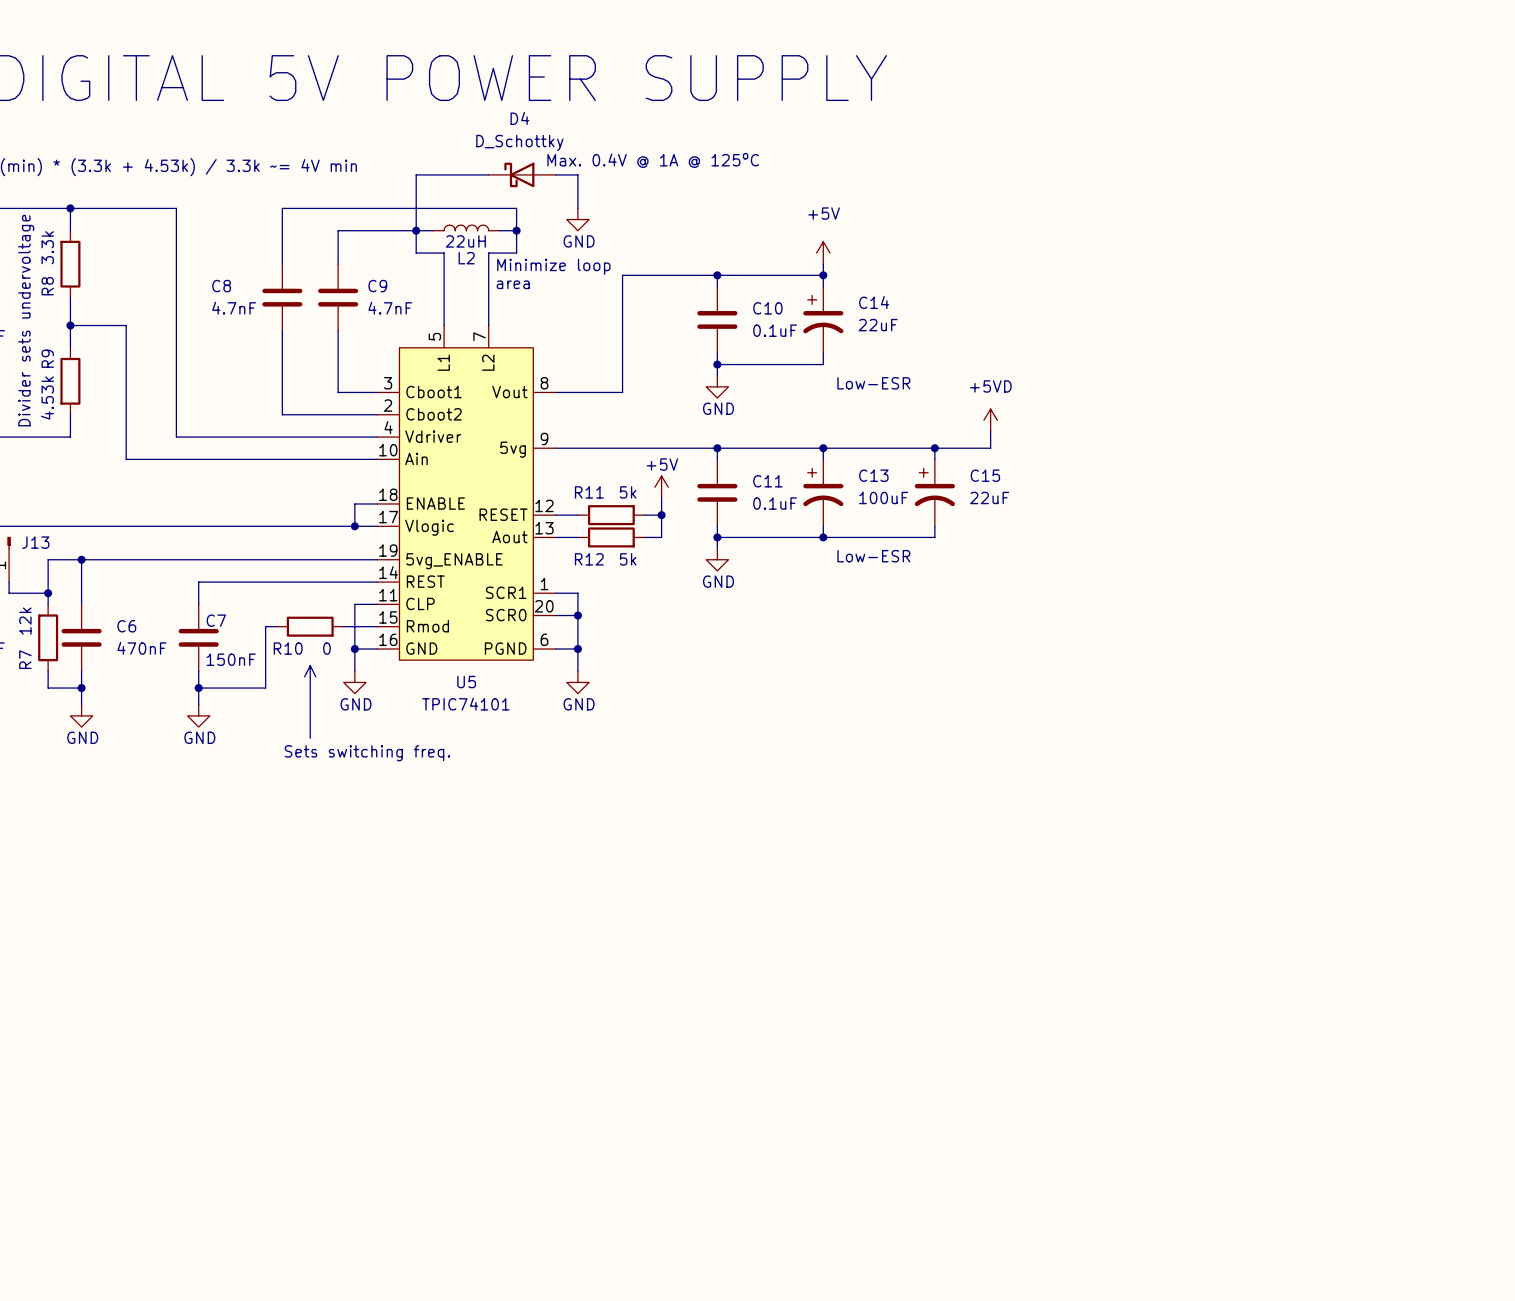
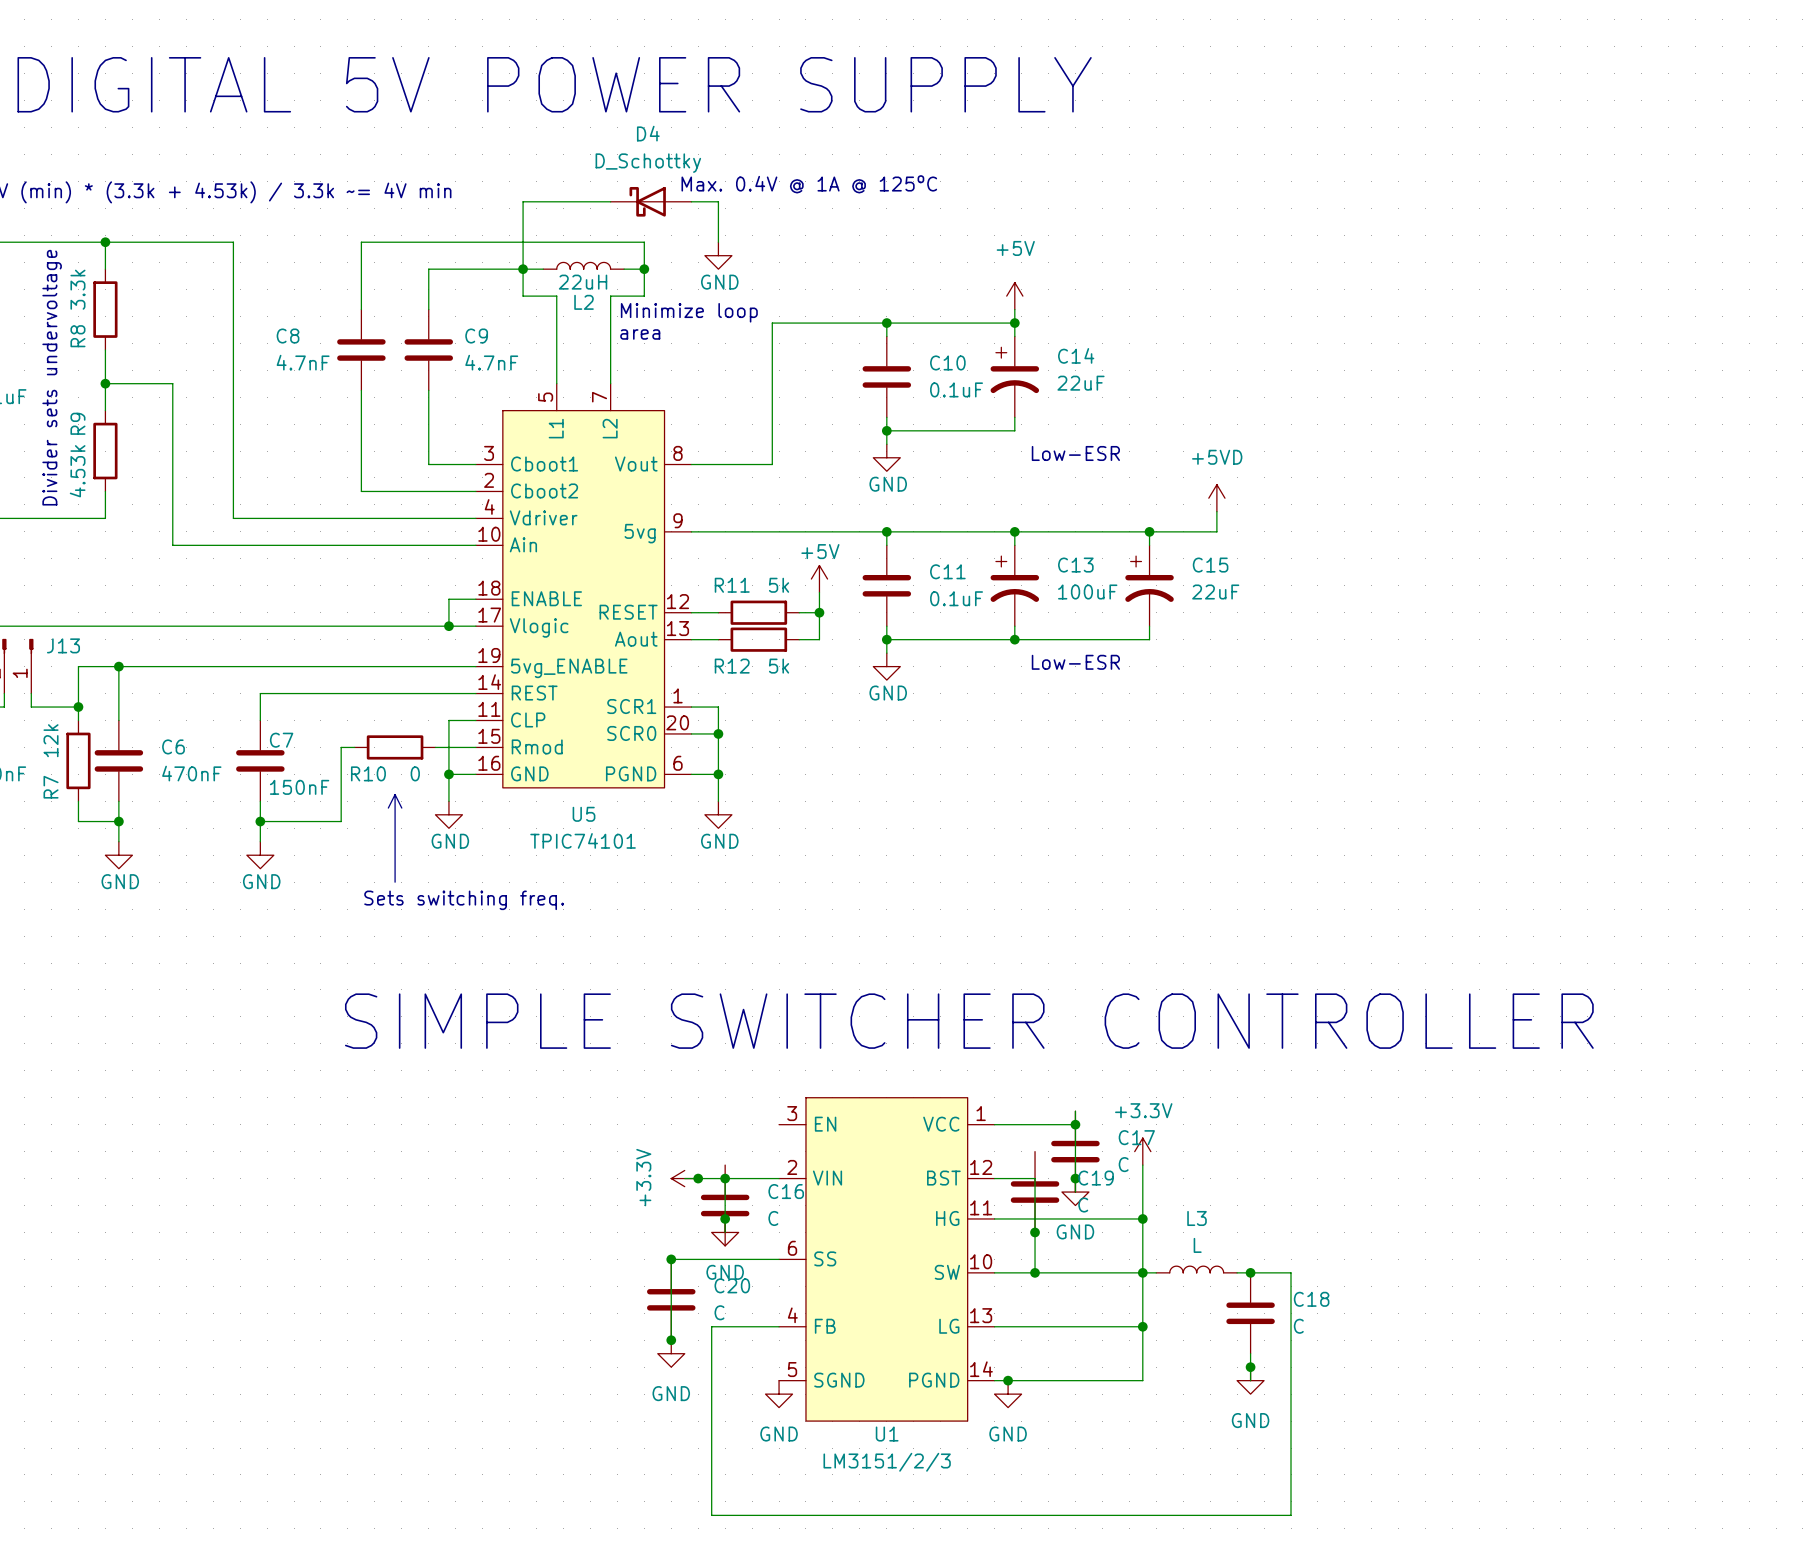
text: none -> SIMPLE SWITCHER CONTROLLER (969, 1021)
wire: none -> (1075, 1111) (1075, 1192)
wire: none -> (994, 1124) (1075, 1124)
junction: none -> (1075, 1124)
C17: none -> C (1075, 1151)
power symbol: none -> +3.3V (1142, 1151)
wire: none -> (1142, 1165) (1142, 1380) (994, 1380)
wire: none -> (684, 1178) (779, 1178)
power symbol: none -> +3.3V (684, 1178)
junction: none -> (698, 1178)
wire: none -> (725, 1178) (725, 1232)
junction: none -> (725, 1178)
wire: none -> (994, 1178) (1035, 1178) (1035, 1272)
junction: none -> (1075, 1178)
C19: none -> C (1035, 1192)
power symbol: none -> GND (1075, 1192)
C16: none -> C (725, 1205)
junction: none -> (725, 1218)
wire: none -> (994, 1218) (1142, 1218)
junction: none -> (1142, 1218)
power symbol: none -> GND (725, 1232)
junction: none -> (1035, 1232)
junction: none -> (671, 1259)
wire: none -> (779, 1259) (671, 1259) (671, 1340)
U1: none -> LM3151/2/3 (886, 1259)
L3: none -> L (1196, 1269)
wire: none -> (994, 1272) (1156, 1272)
junction: none -> (1035, 1272)
junction: none -> (1142, 1272)
wire: none -> (1237, 1272) (1291, 1272) (1291, 1515) (711, 1515) (711, 1326) (779, 1326)
junction: none -> (1250, 1272)
C20: none -> C (671, 1299)
C18: none -> C (1250, 1313)
wire: none -> (994, 1326) (1142, 1326)
junction: none -> (1142, 1326)
junction: none -> (671, 1340)
power symbol: none -> GND (671, 1353)
wire: none -> (1250, 1353) (1250, 1380)
junction: none -> (1250, 1367)
junction: none -> (1008, 1380)
power symbol: none -> GND (1250, 1380)
power symbol: none -> GND (779, 1394)
power symbol: none -> GND (1008, 1394)

